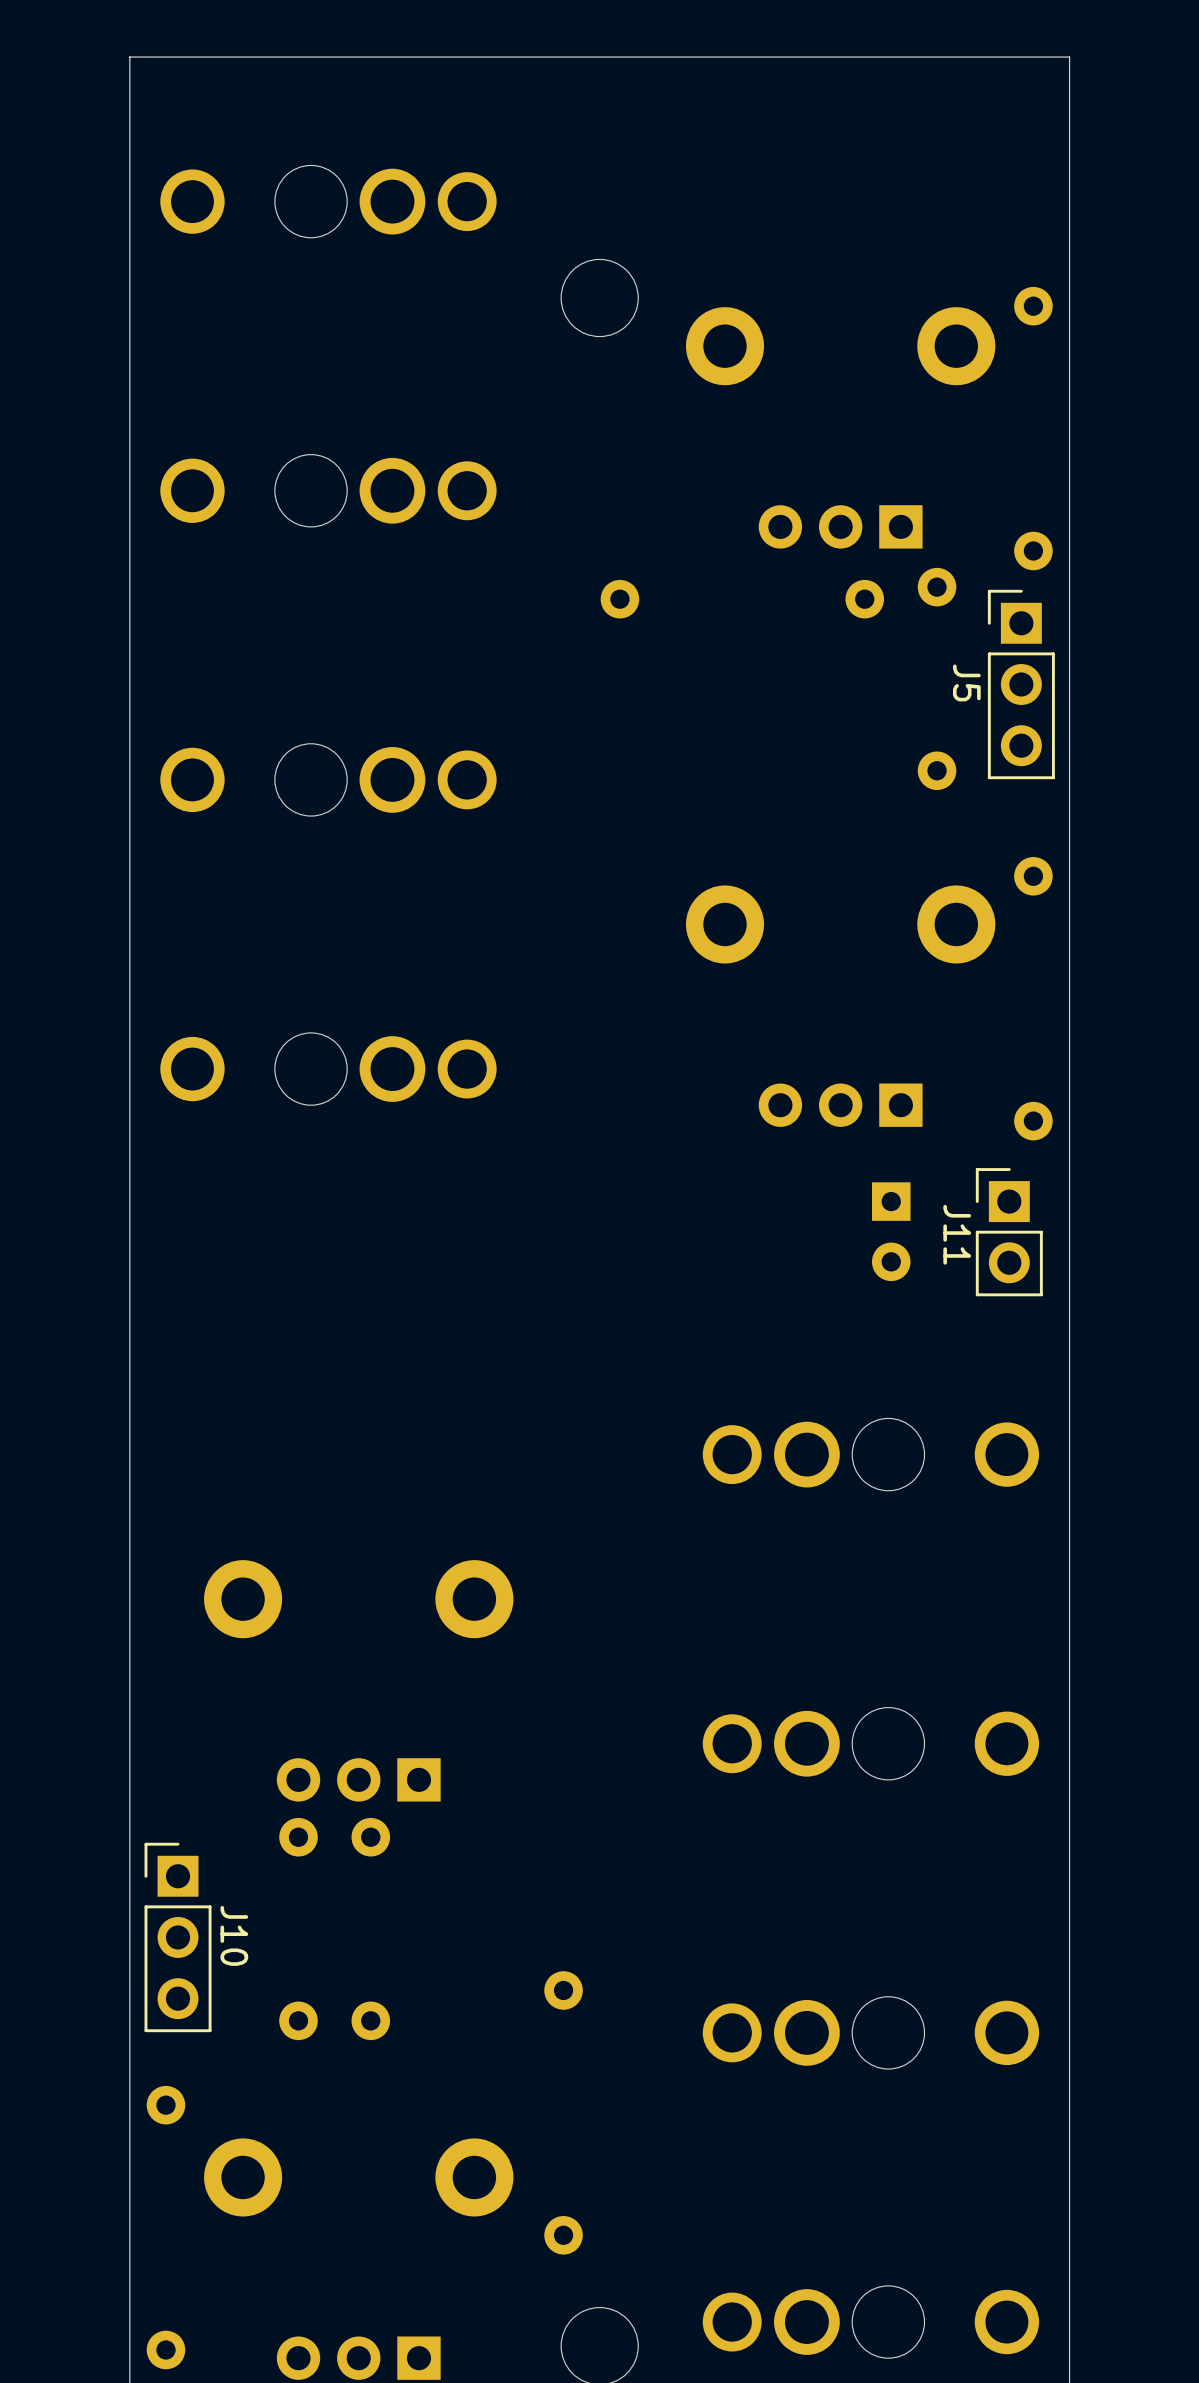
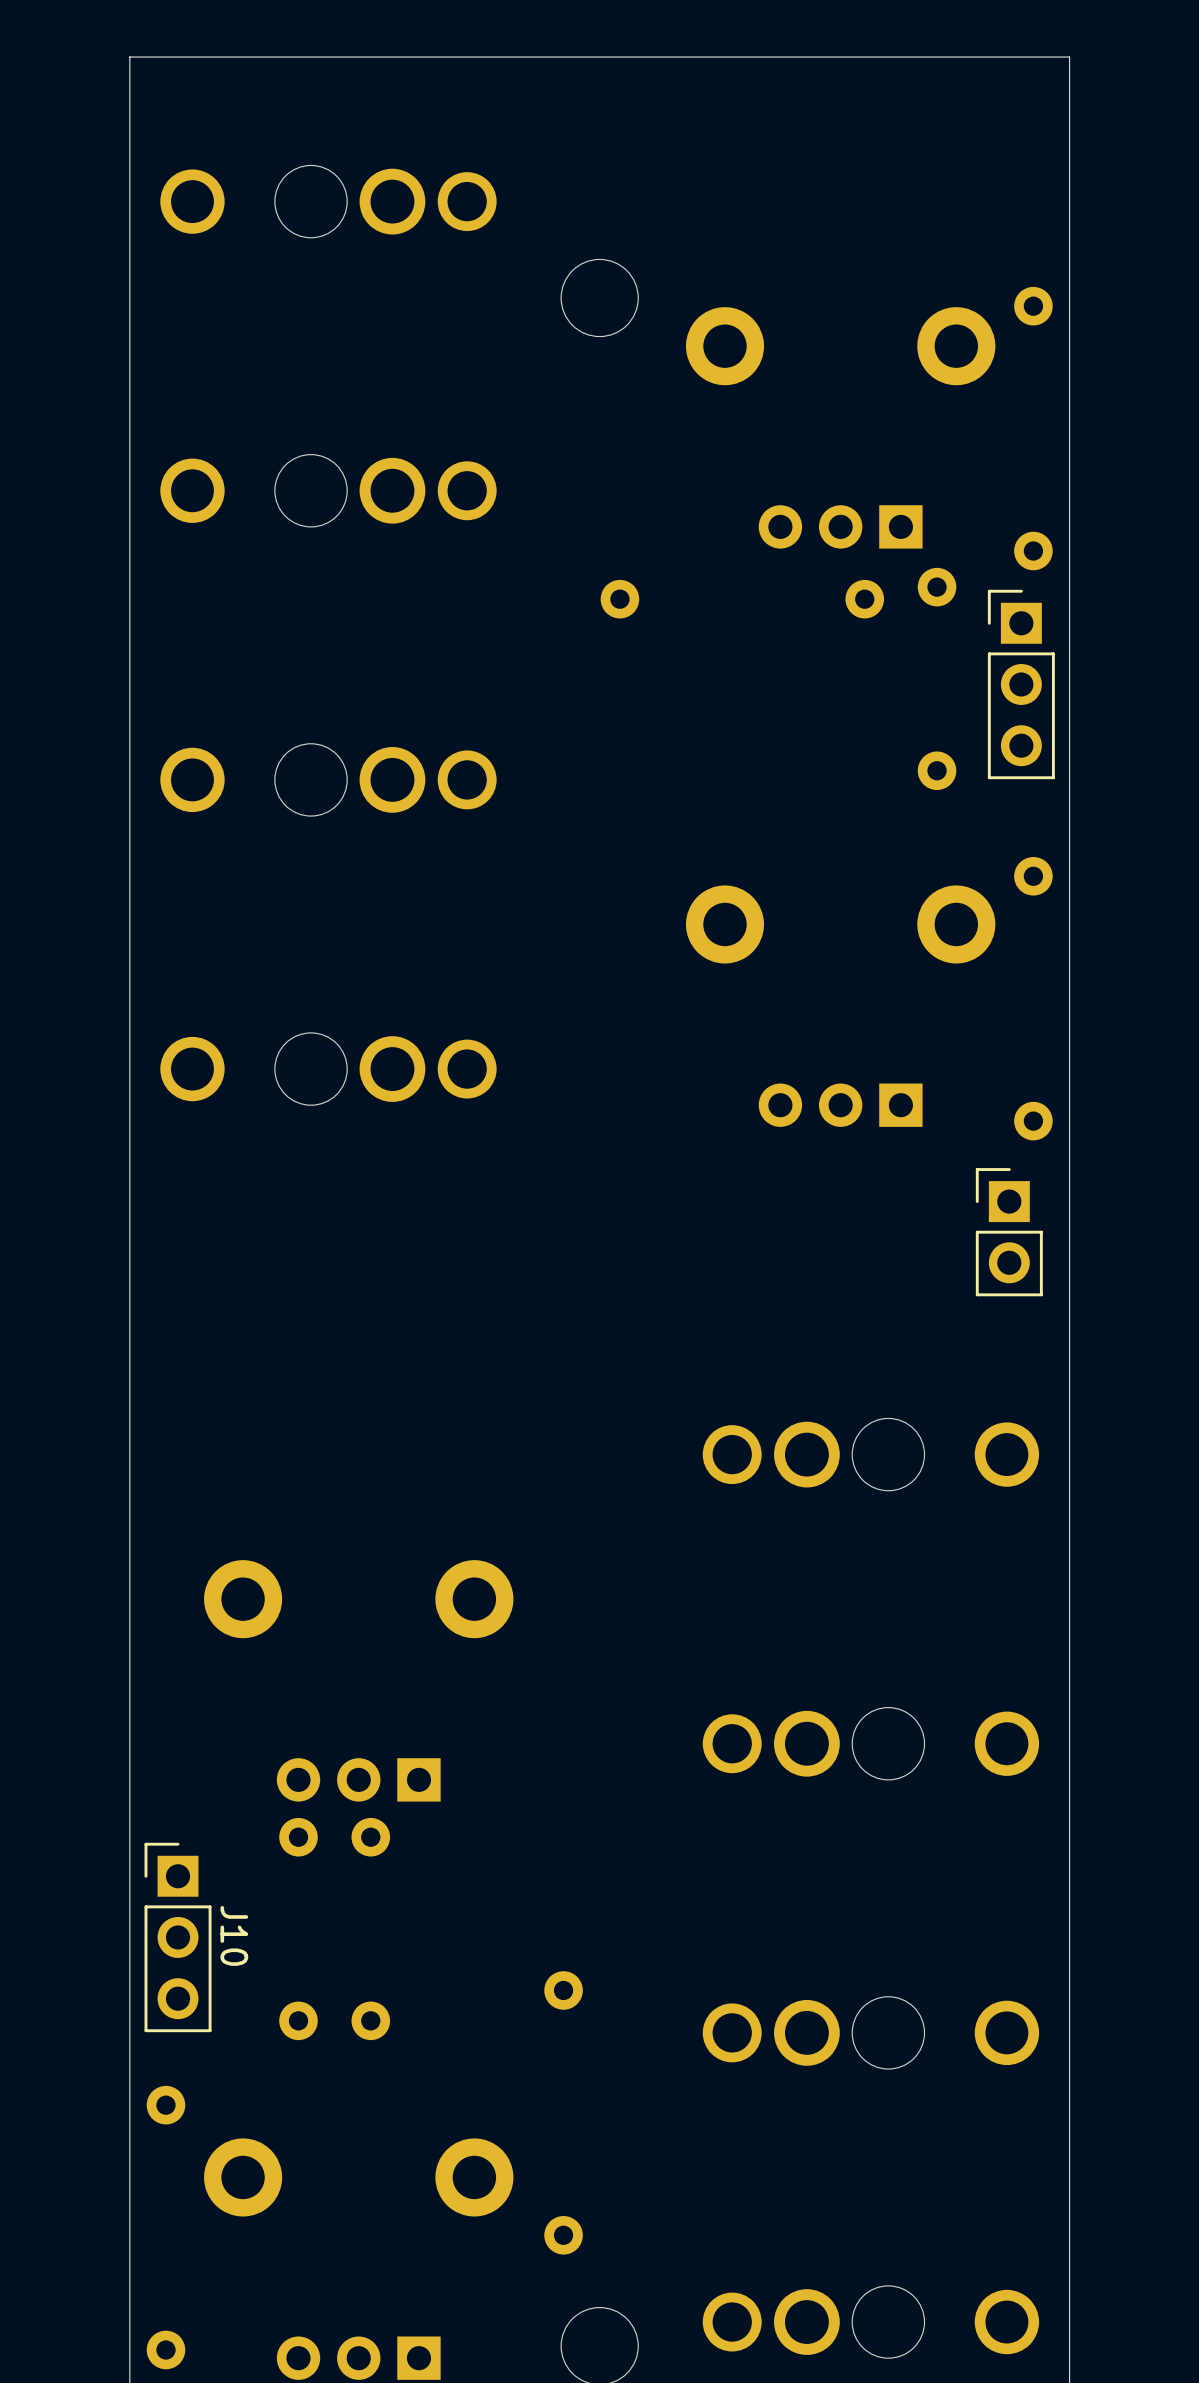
J5 name: J5 (966, 682) -> none
part: (891, 1231) -> none
J11 name: J11 (957, 1234) -> none

